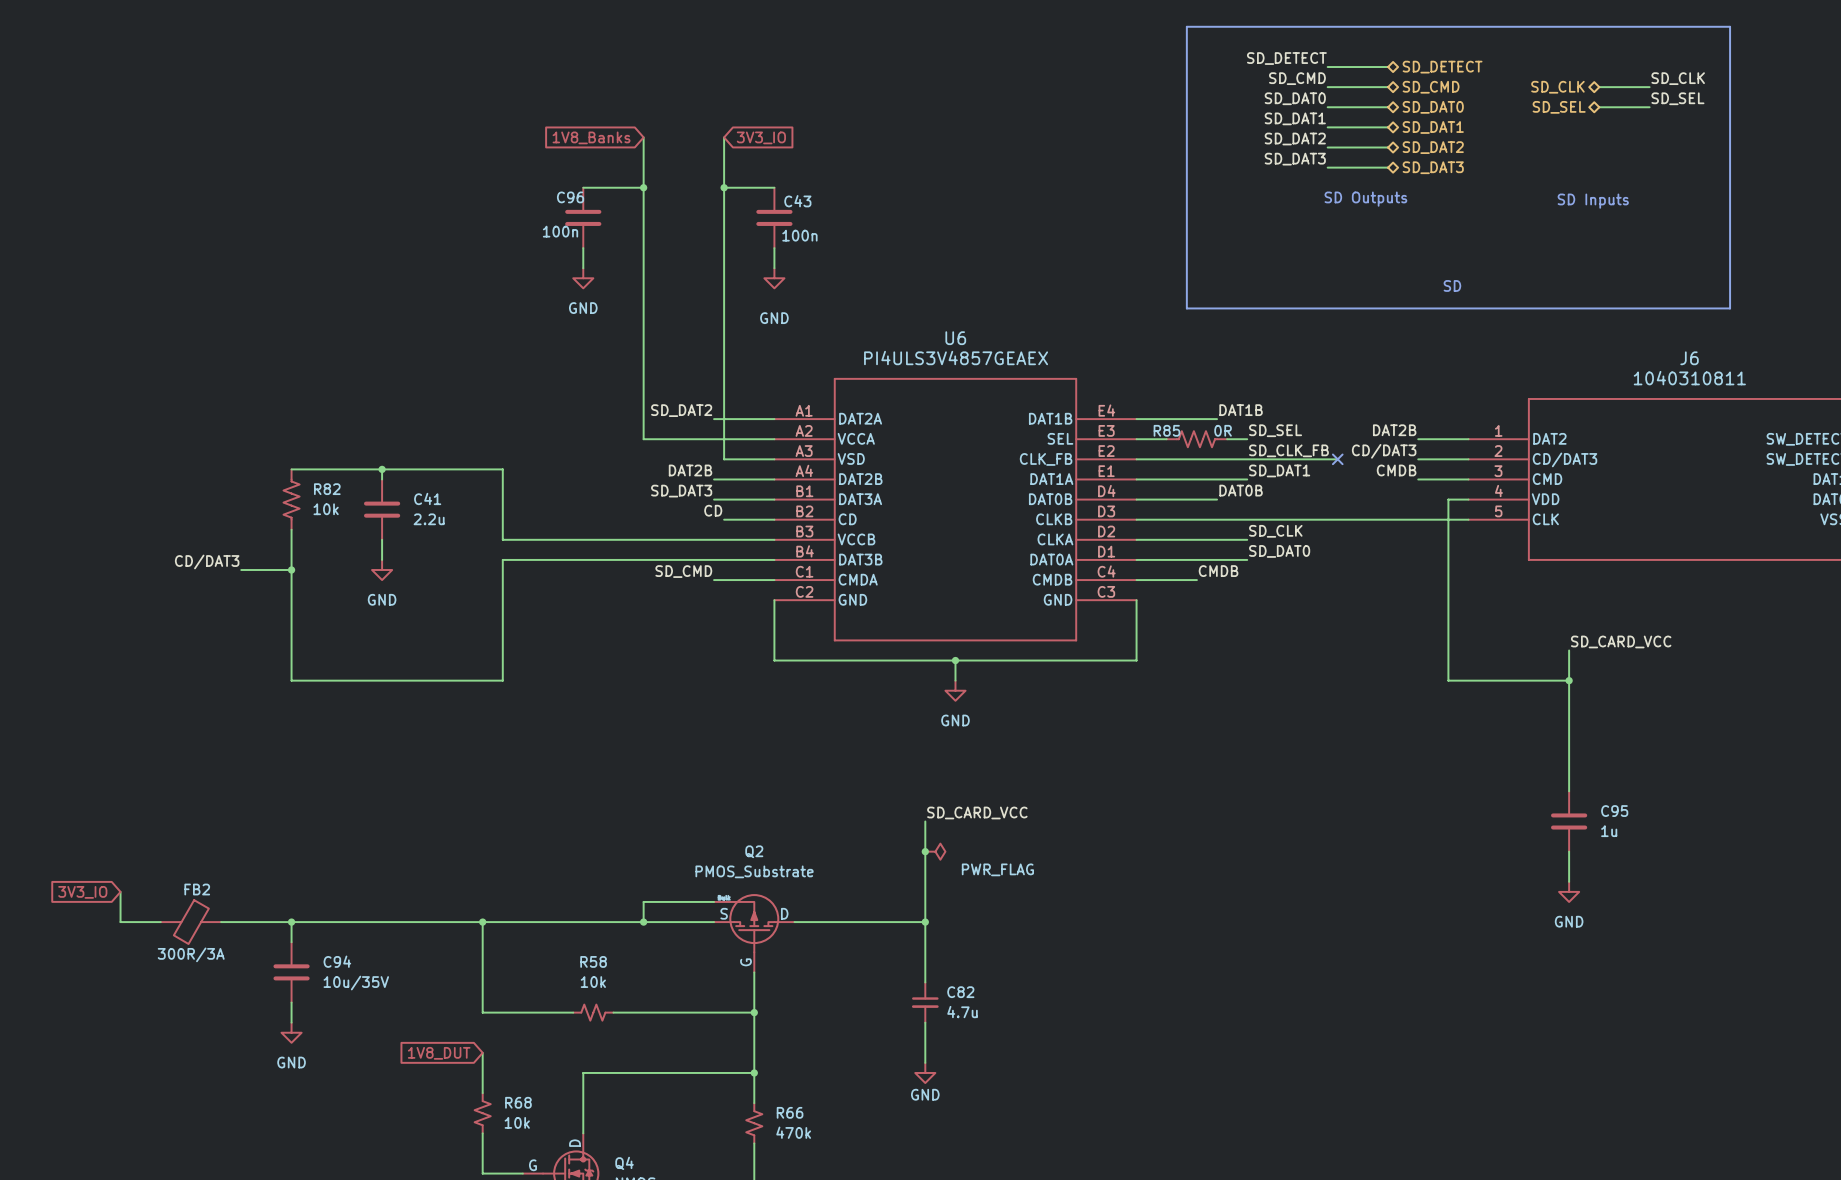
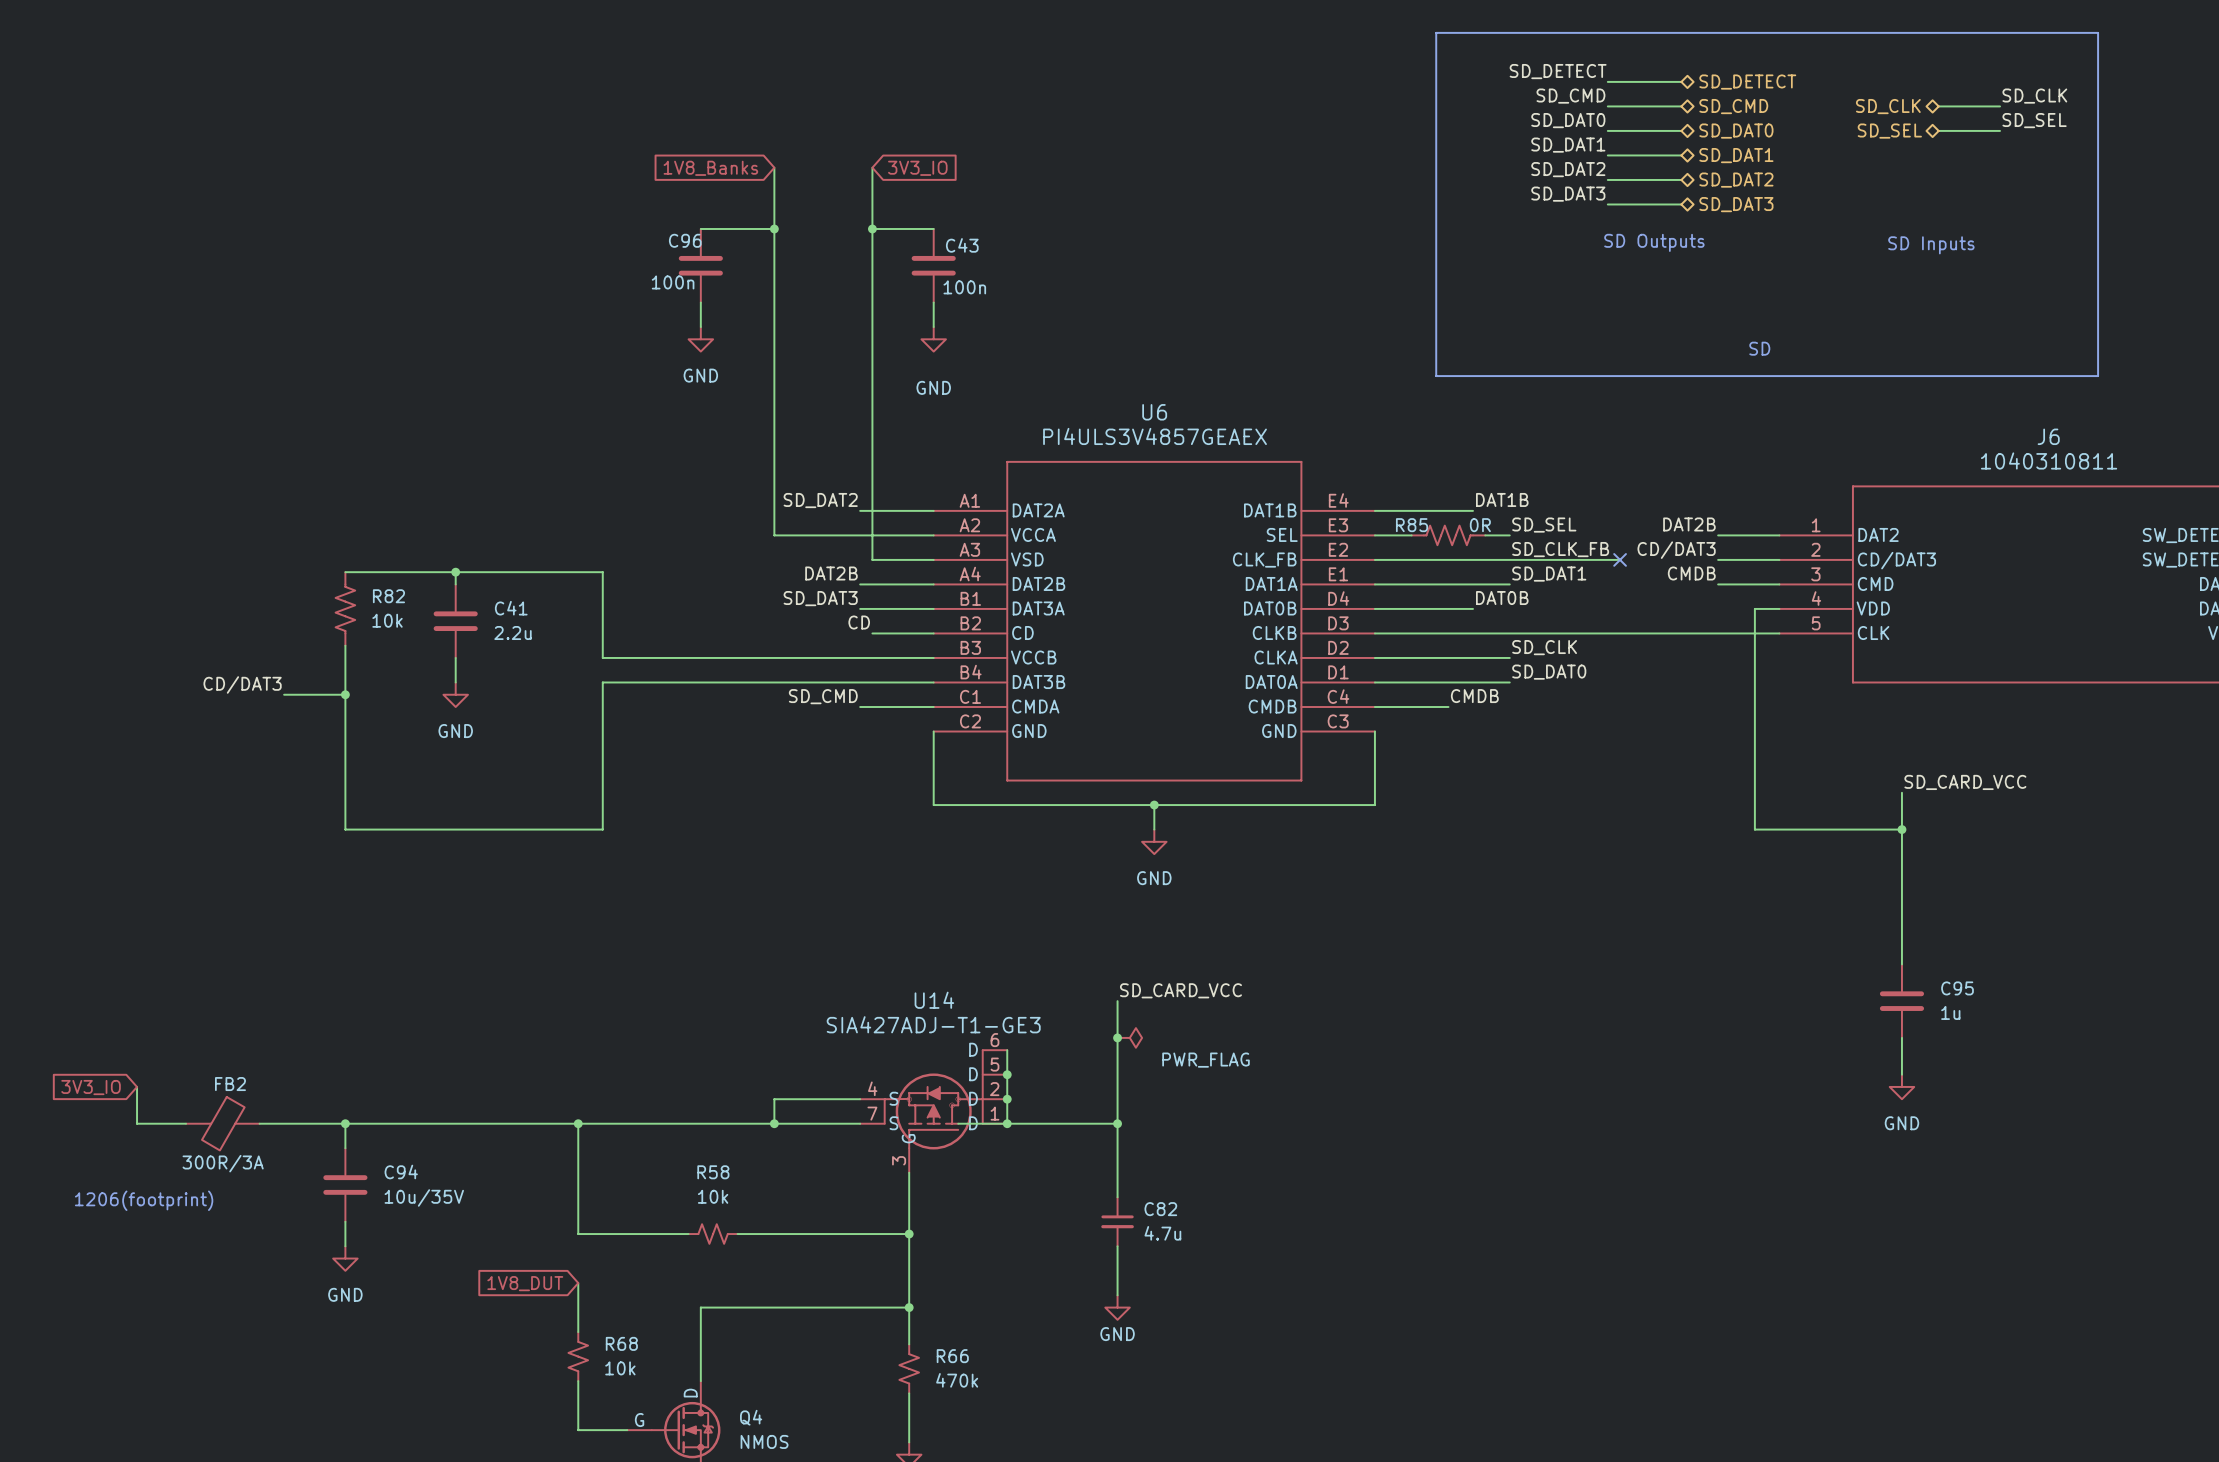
wire: none -> (1007, 1050) (1007, 1123)
junction: none -> (1007, 1074)
junction: none -> (1007, 1099)
U14: none -> SIA427ADJ-T1-GE3 (933, 1111)
junction: none -> (1007, 1123)
Q2: PMOS_Substrate (754, 933) -> none
text: none -> 1206(footprint) (144, 1200)

